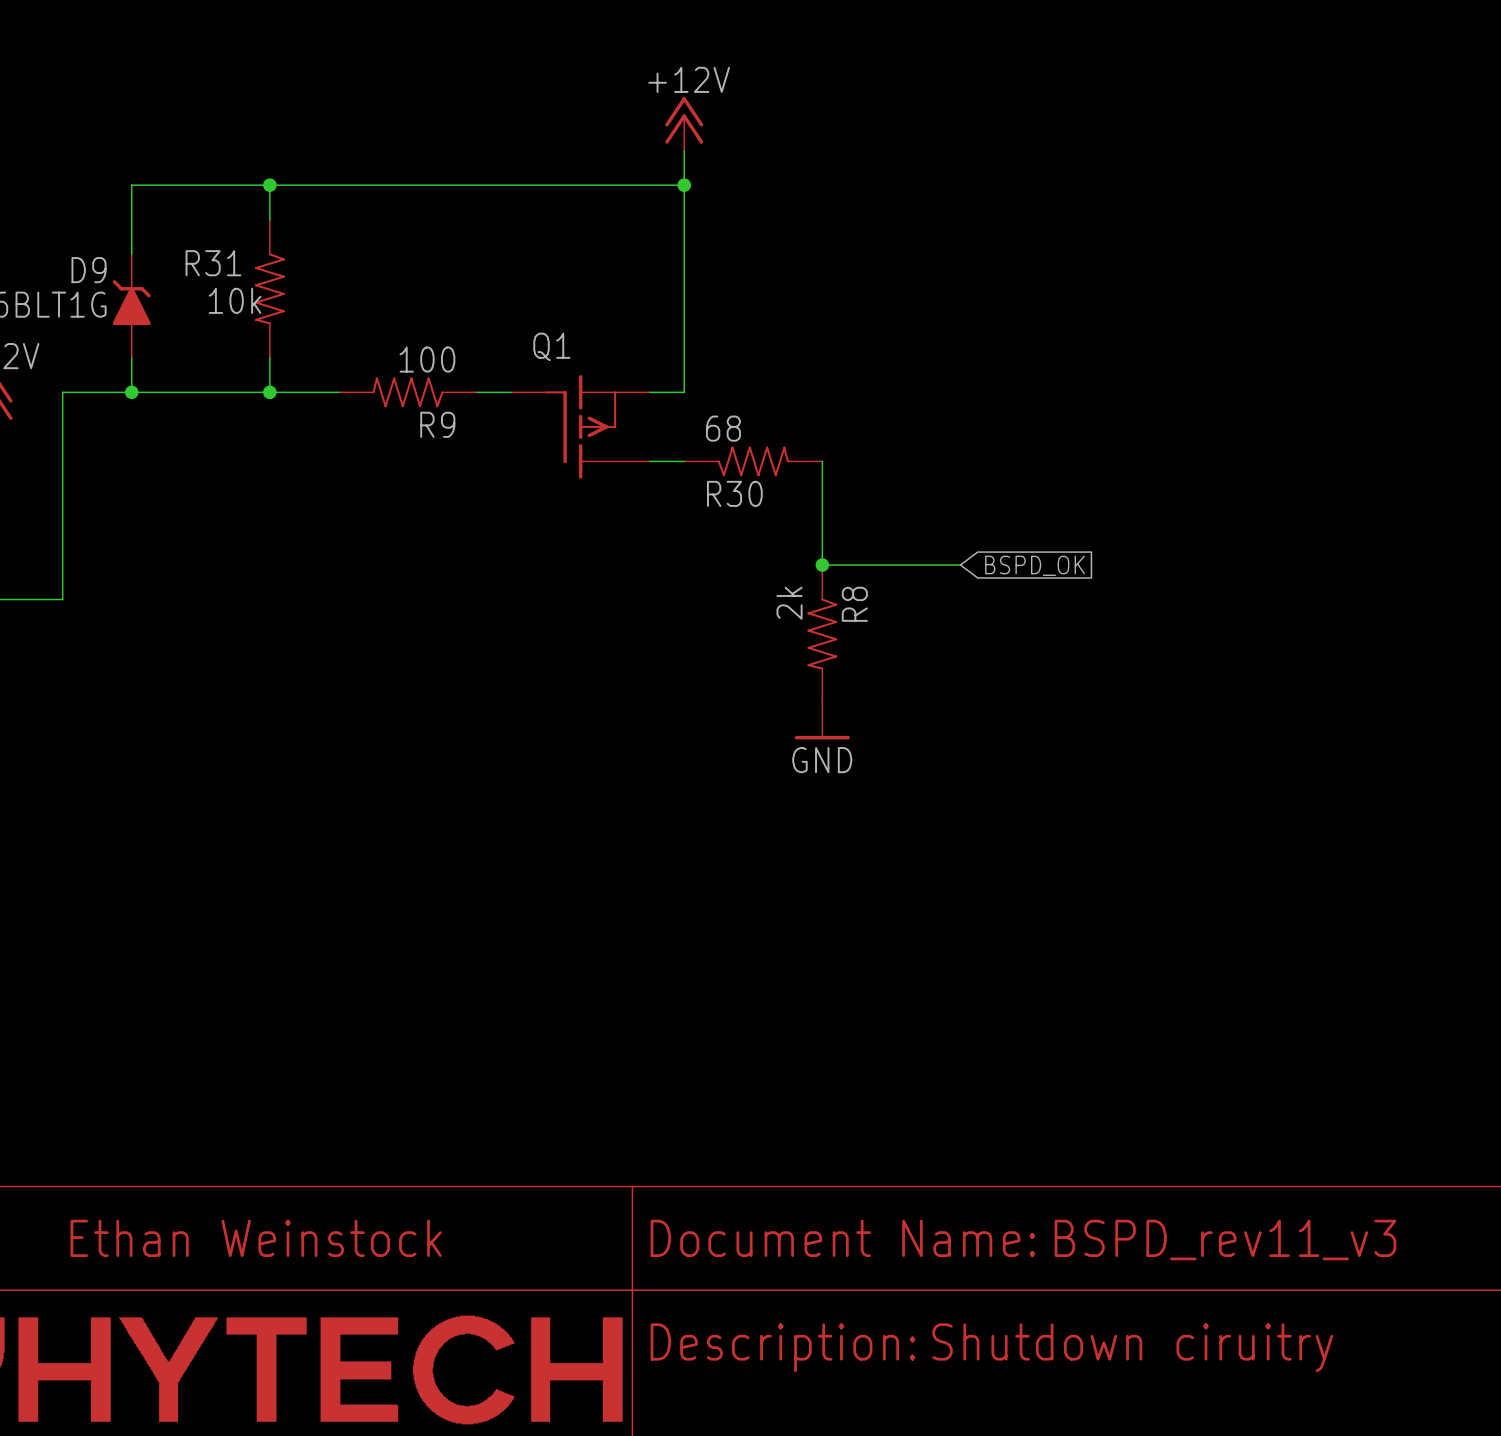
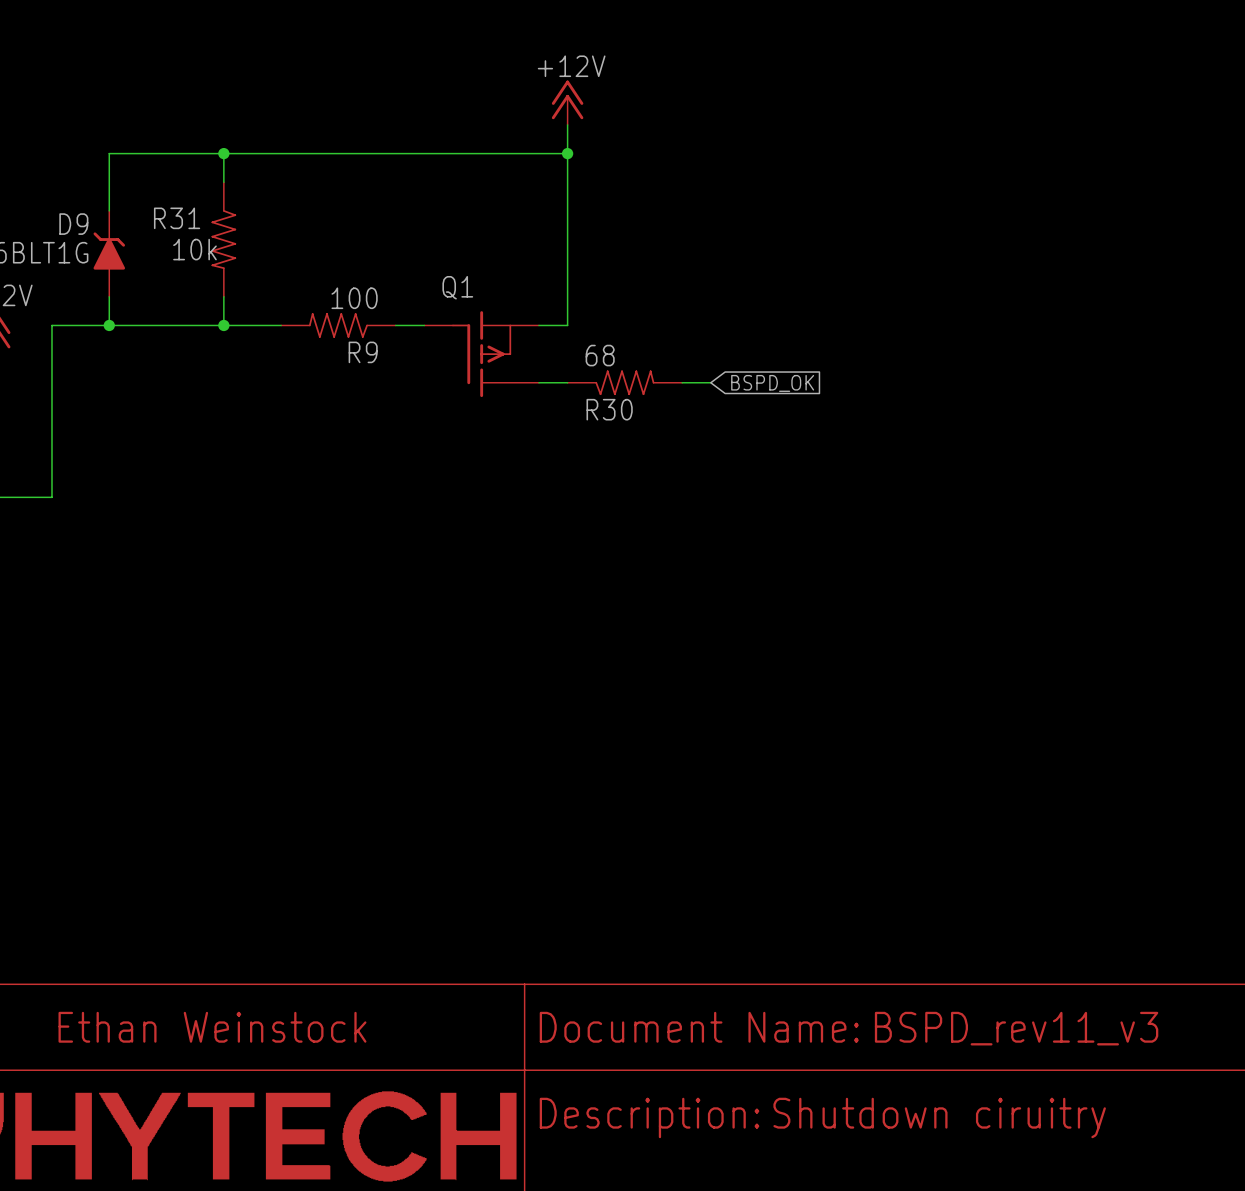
wire: (822, 461) (822, 565) (960, 565) -> (682, 382) (710, 382)
junction: (822, 565) -> none
global label position: BSPD_OK (1035, 565) -> BSPD_OK (772, 383)
R8: 2k (822, 634) -> none
power symbol: GND (822, 721) -> none

